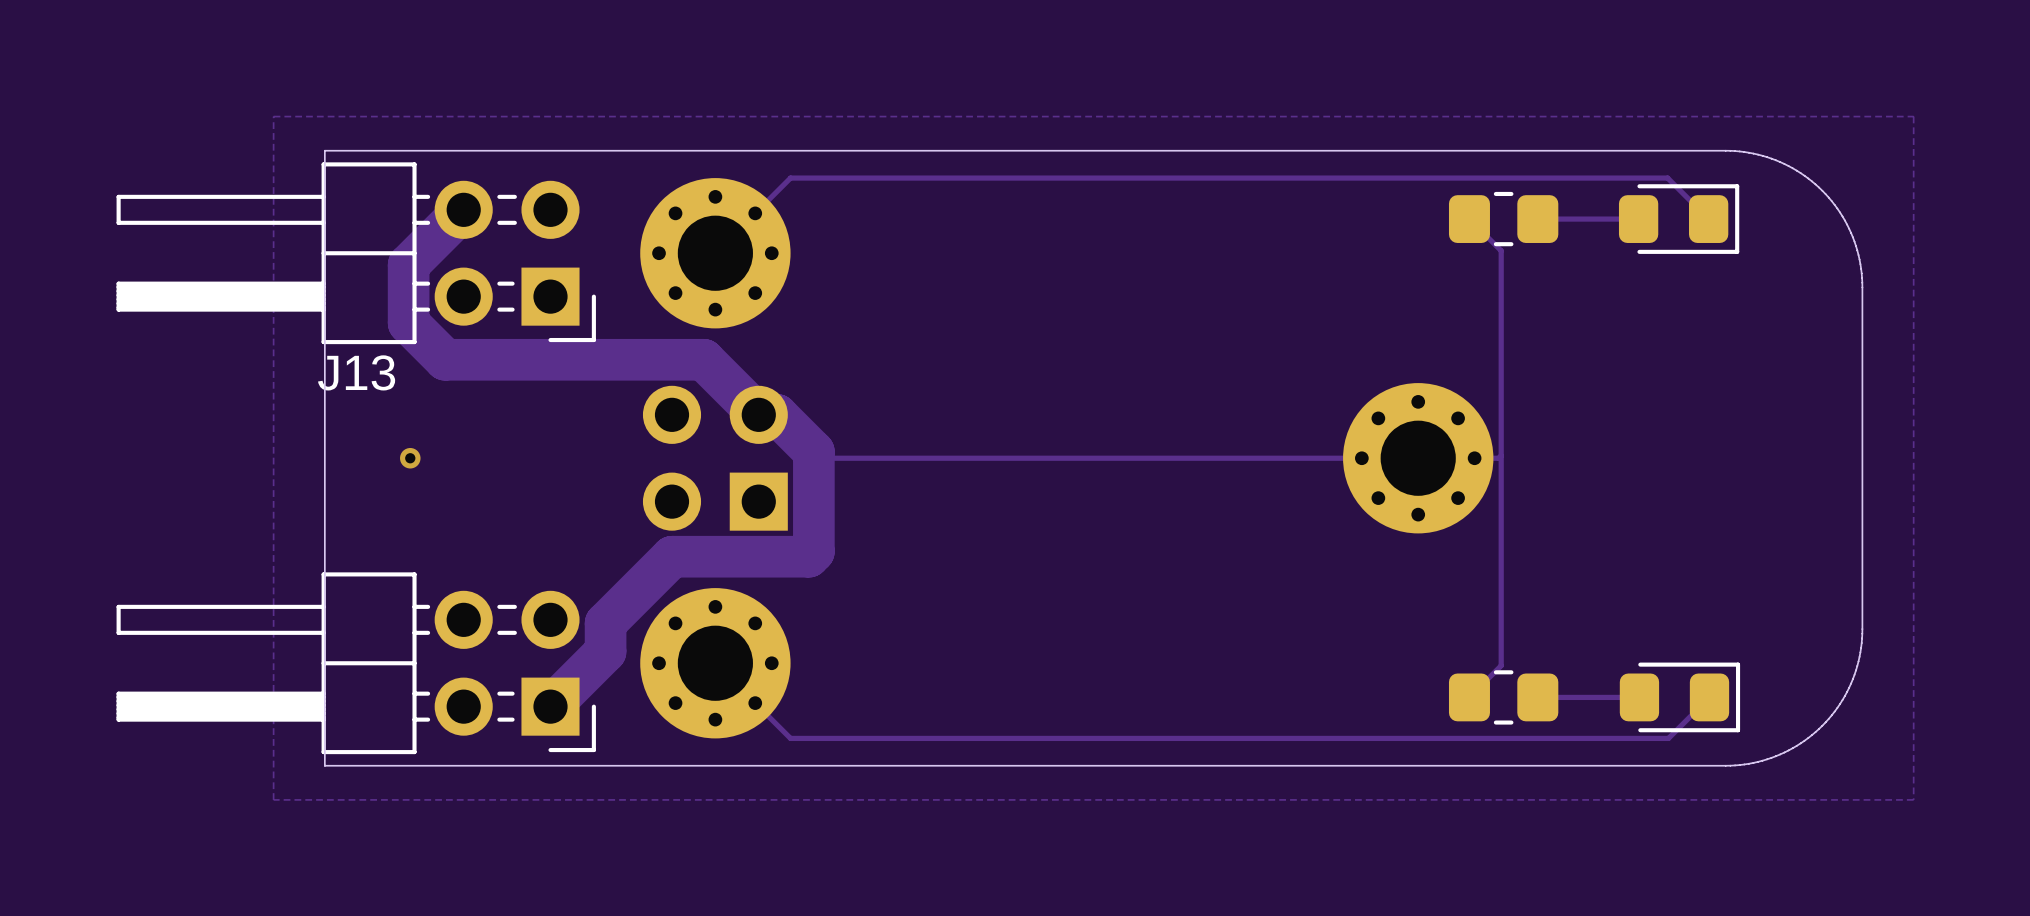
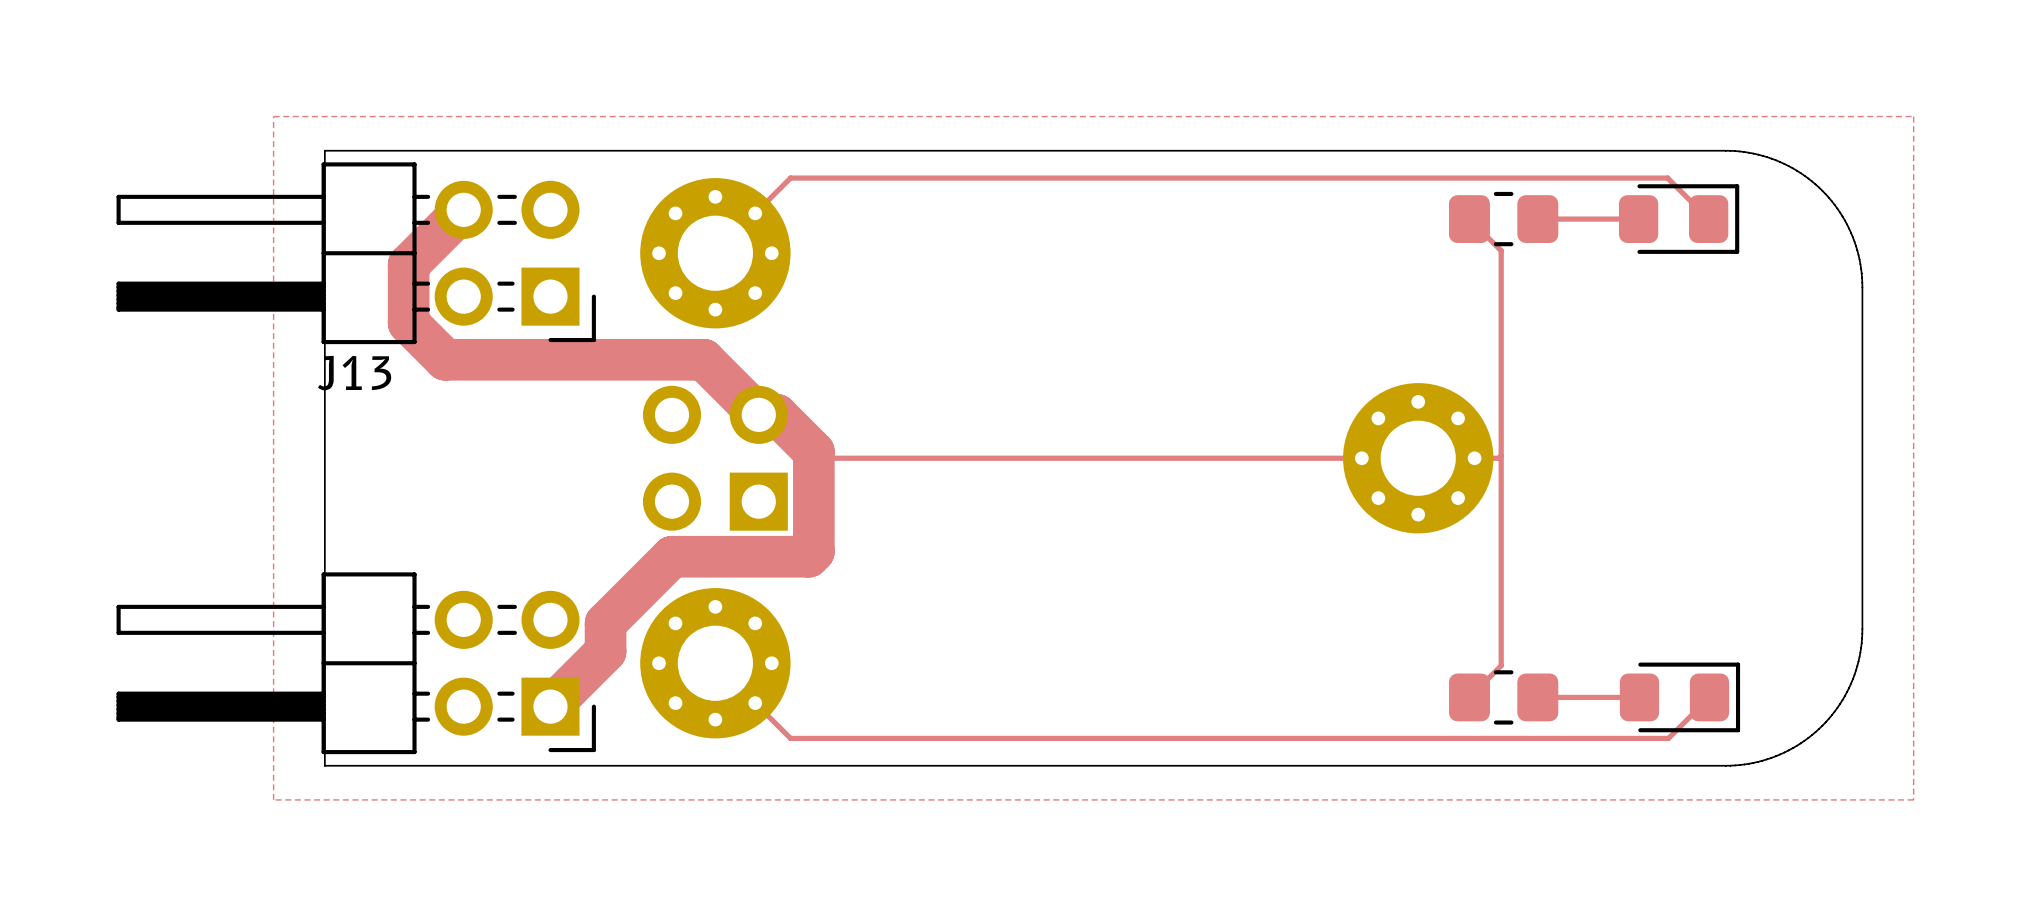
via: (410, 458) -> none

